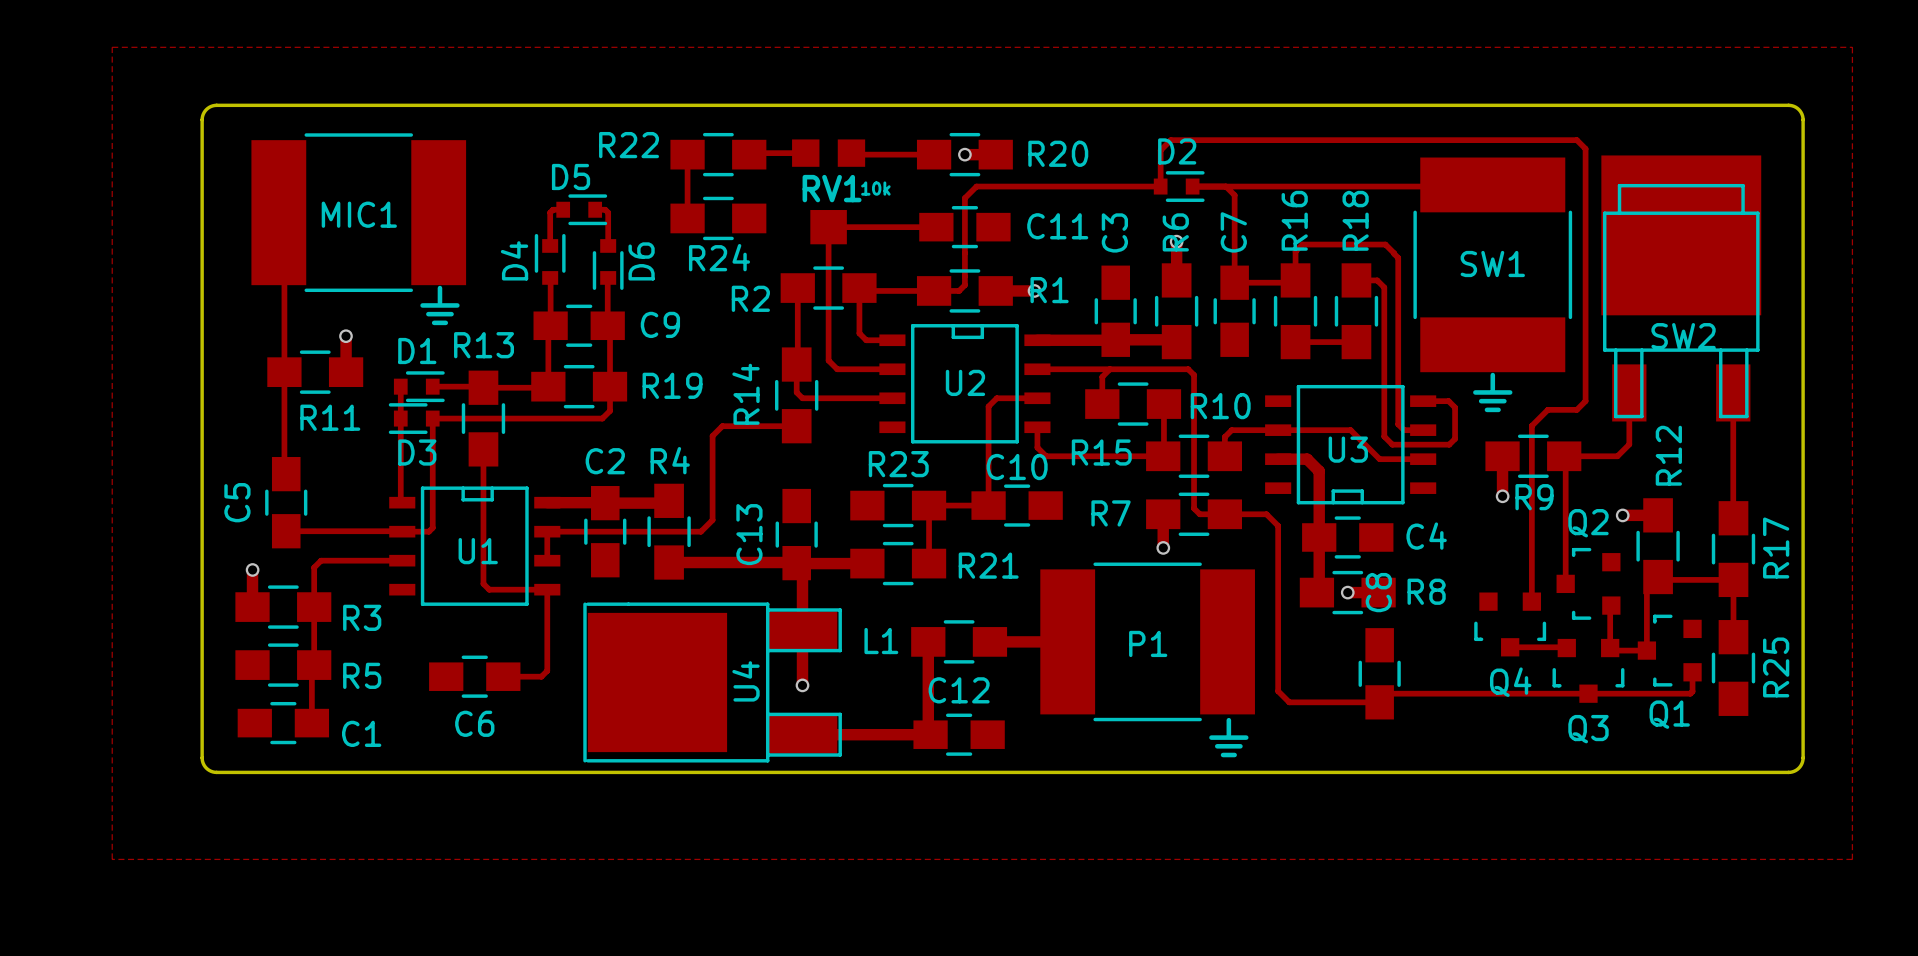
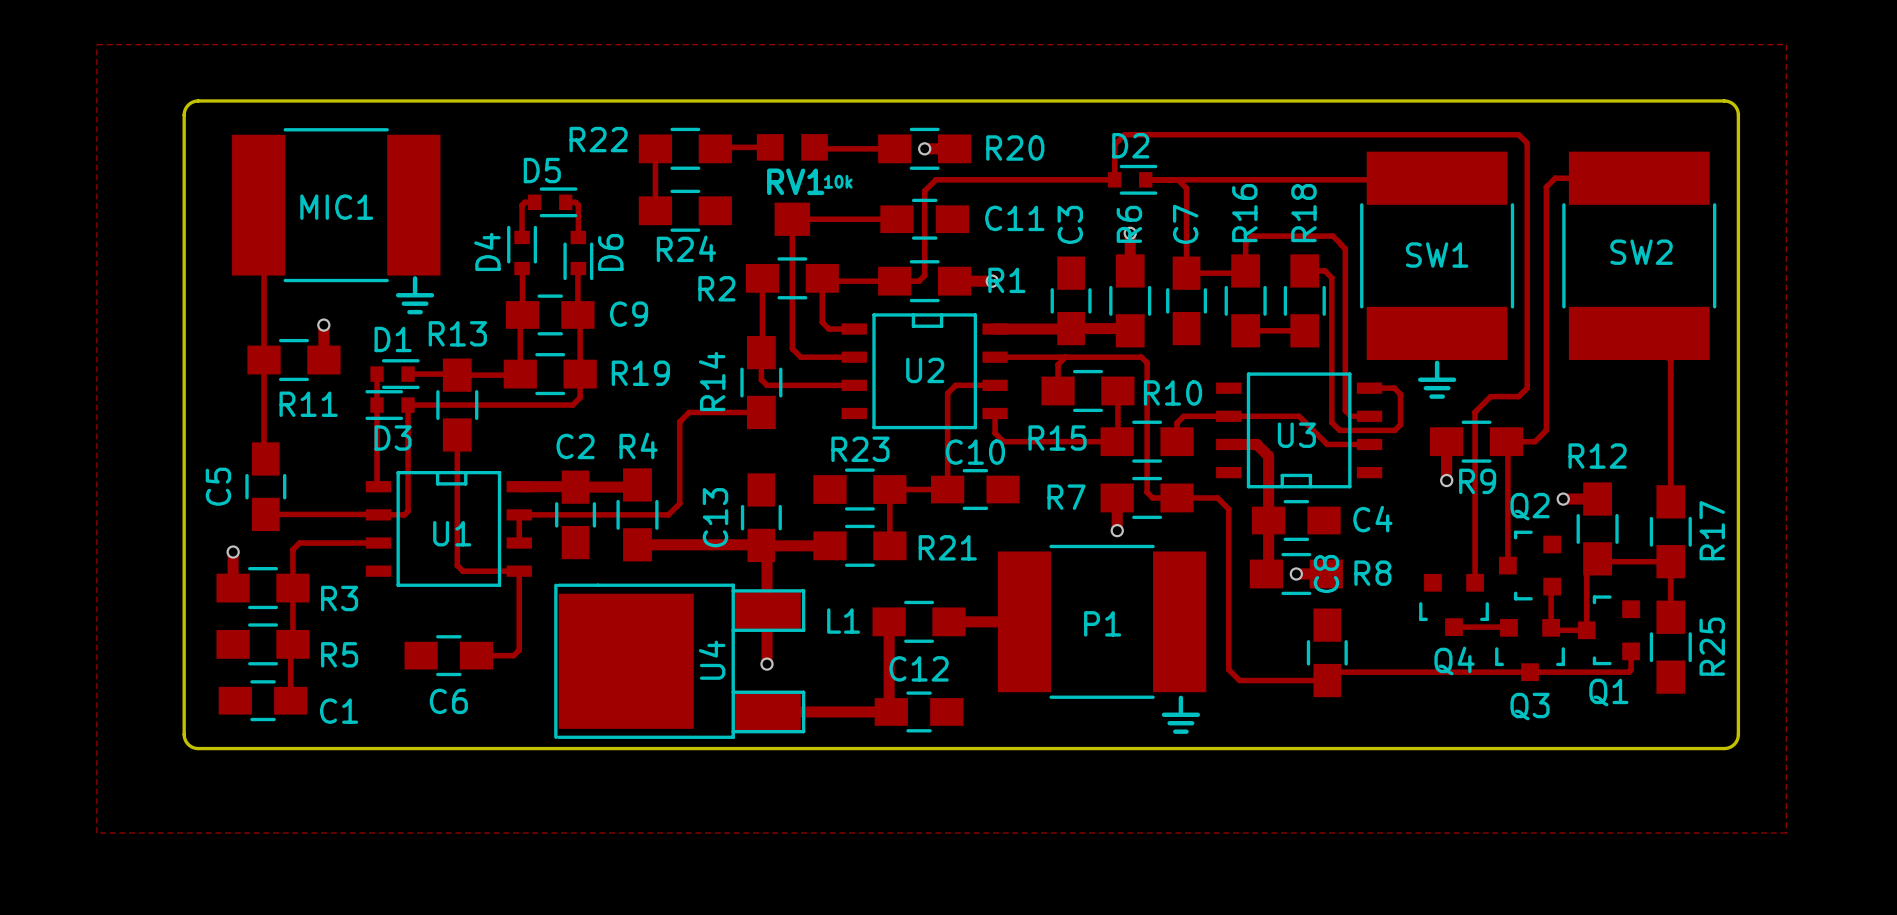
SW2 footprint: [1601, 155, 1762, 422] -> [1562, 151, 1717, 361]
SW2 name position: SW2 (1683, 336) -> SW2 (1641, 252)
track: (1629, 392) (1629, 444) (1617, 456) (1593, 456) -> (1639, 178) (1555, 178) (1546, 187) (1546, 430) (1535, 441)
track: (1733, 392) (1733, 518) -> (1639, 333) (1643, 333) (1670, 360) (1670, 501)
R12 name rotation: 0° (1668, 455) -> 90° clockwise (1597, 456)

